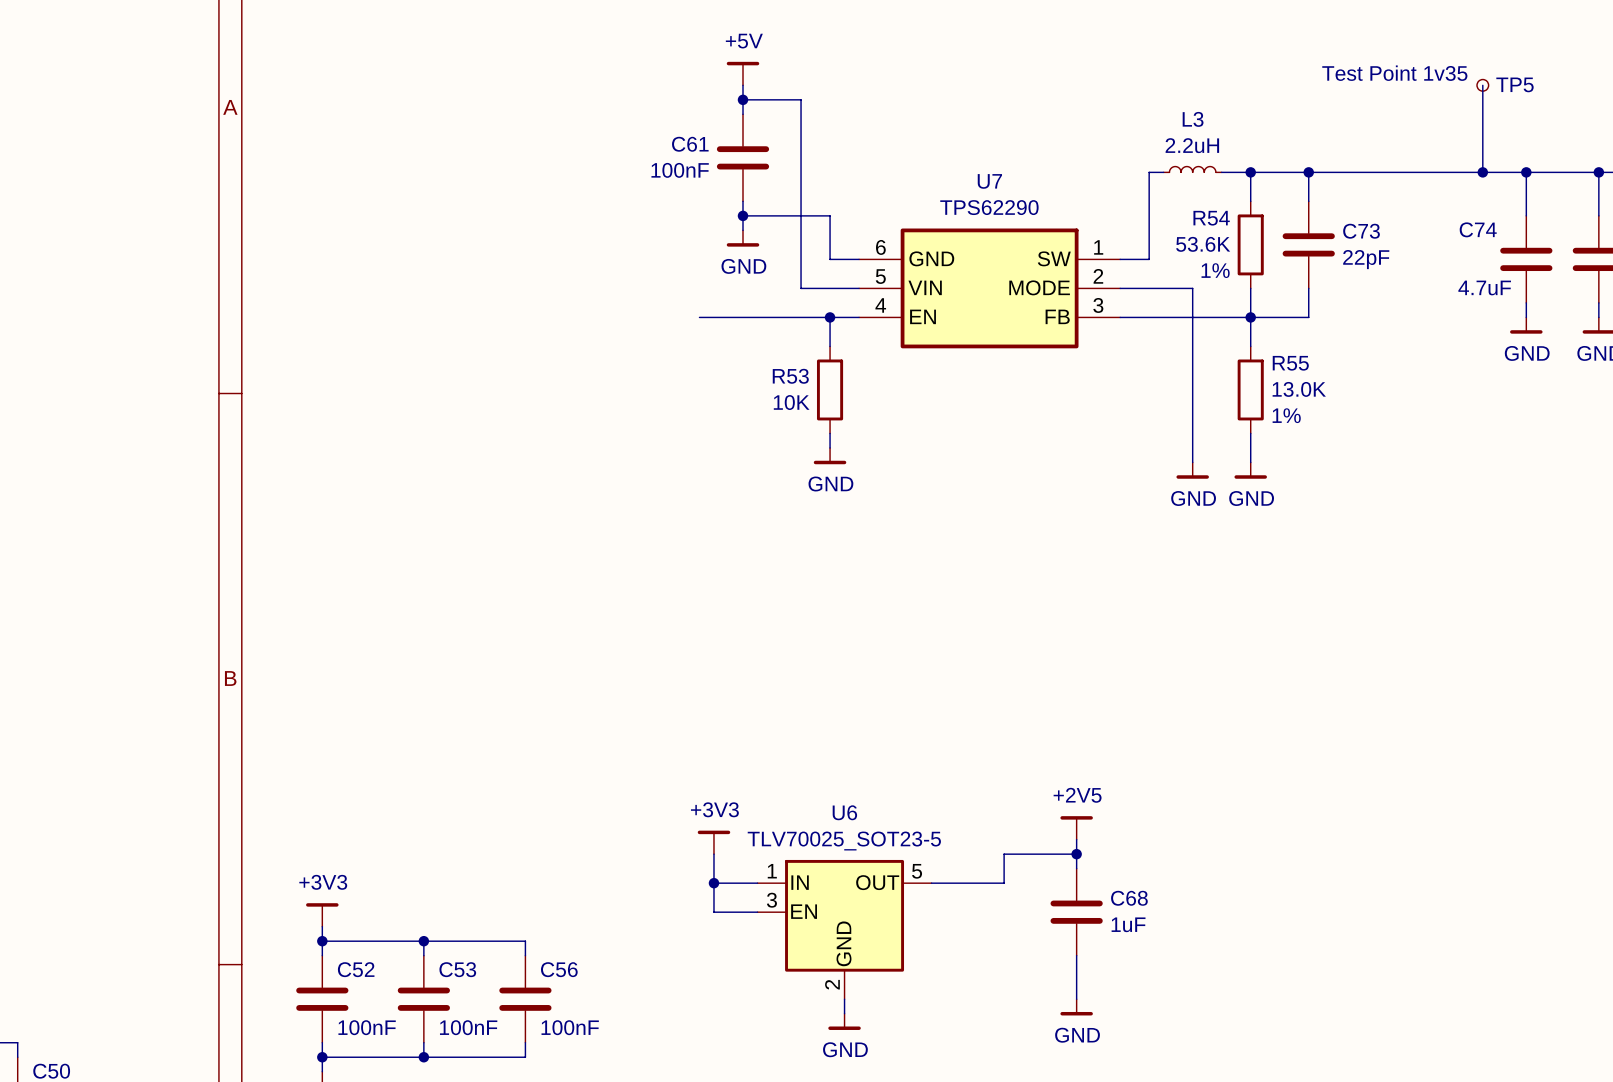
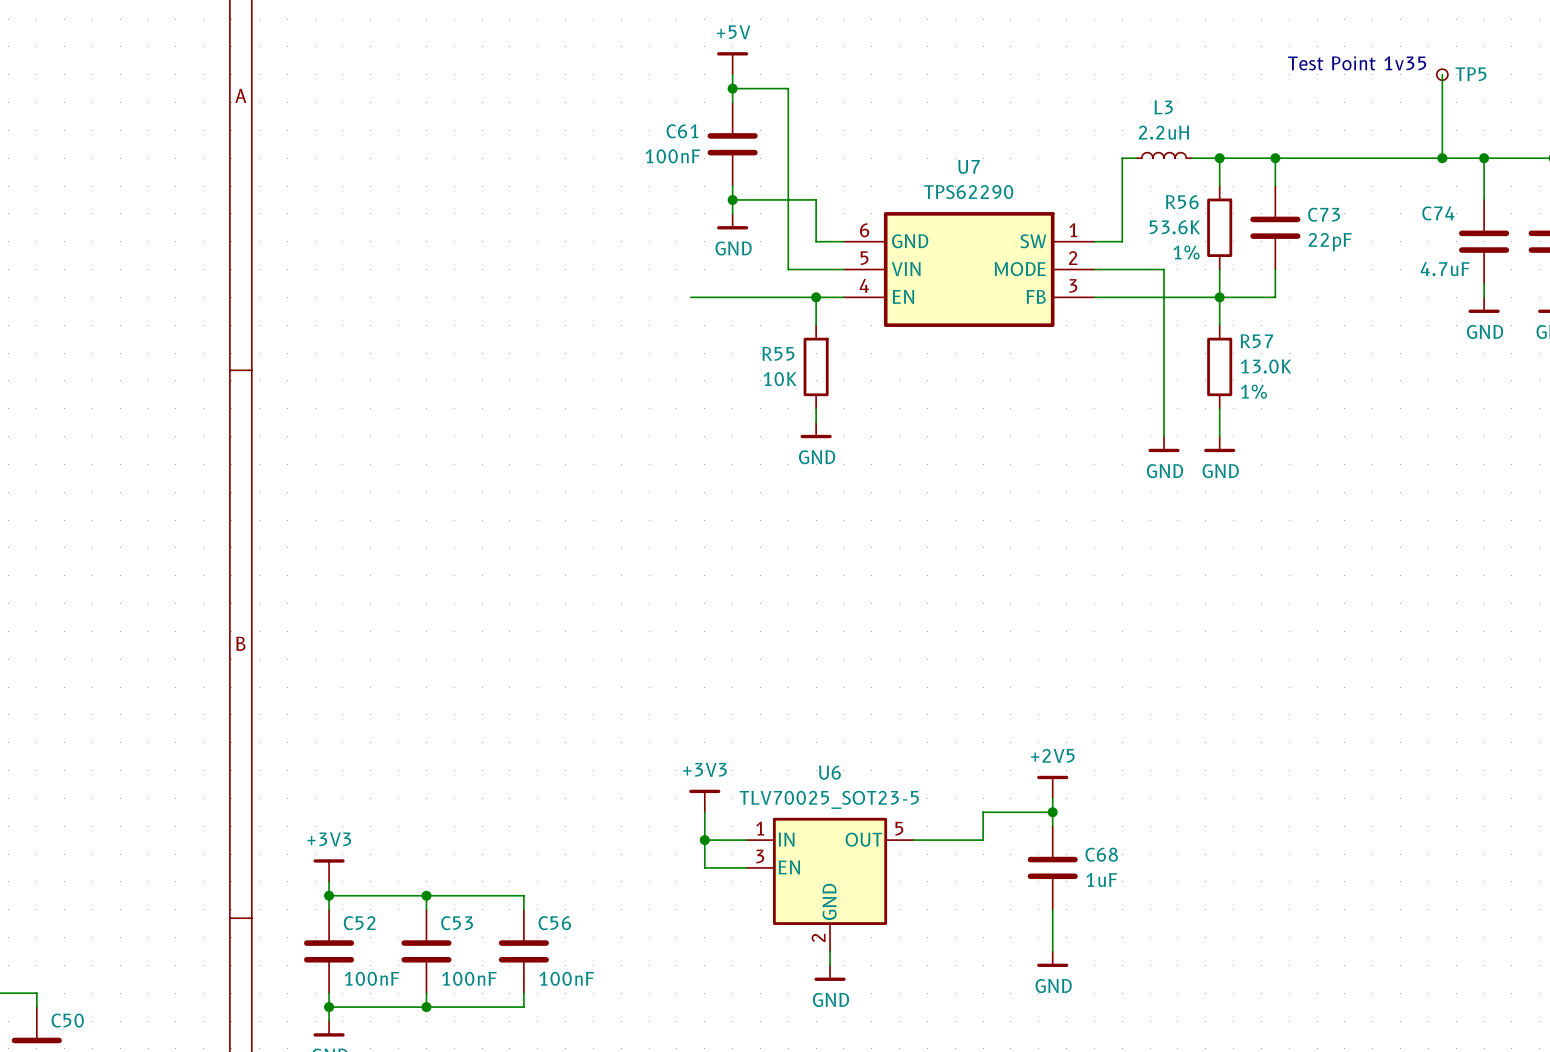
R54 name: R54 (1211, 218) -> R56 (1182, 202)
R55 name: R55 (1290, 363) -> R57 (1256, 341)
R53 name: R53 (790, 376) -> R55 (778, 353)

